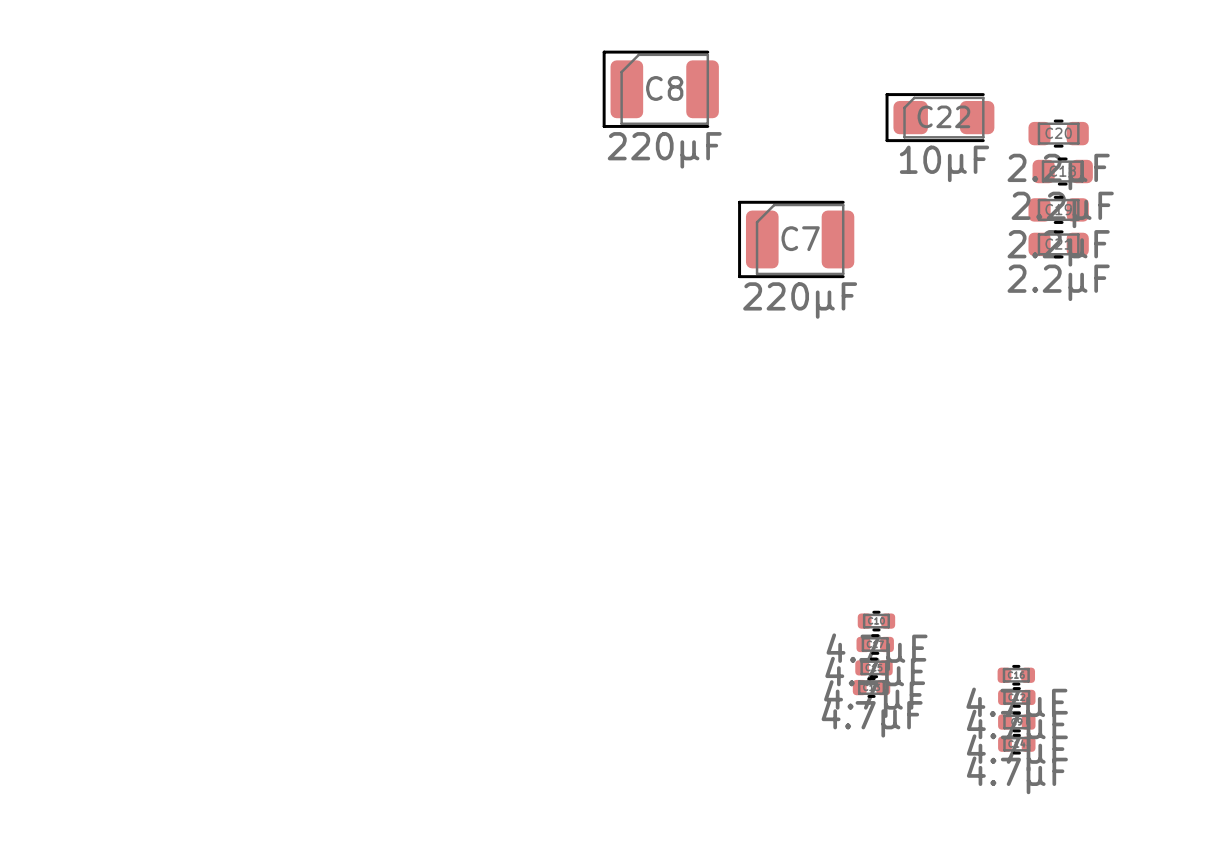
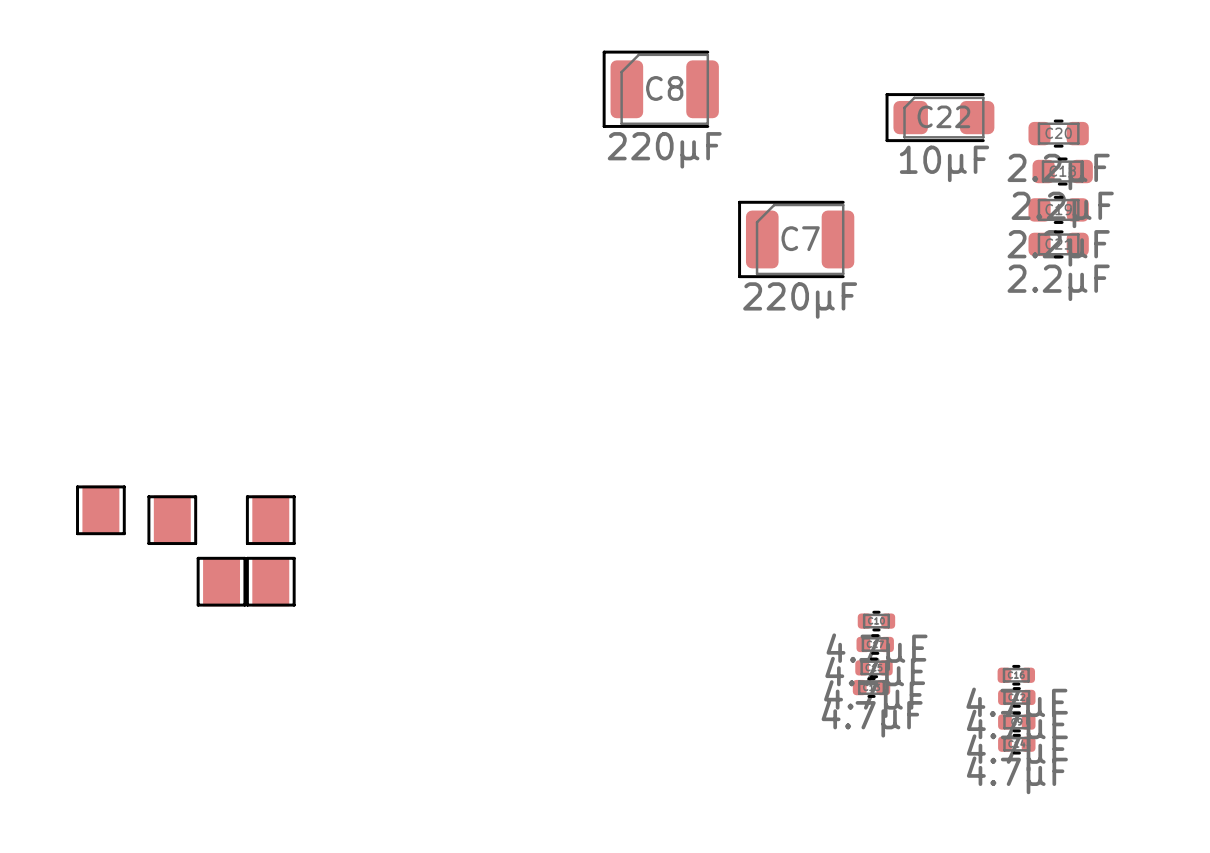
part: none -> (100, 510)
part: none -> (172, 520)
part: none -> (270, 520)
part: none -> (221, 581)
part: none -> (270, 581)

